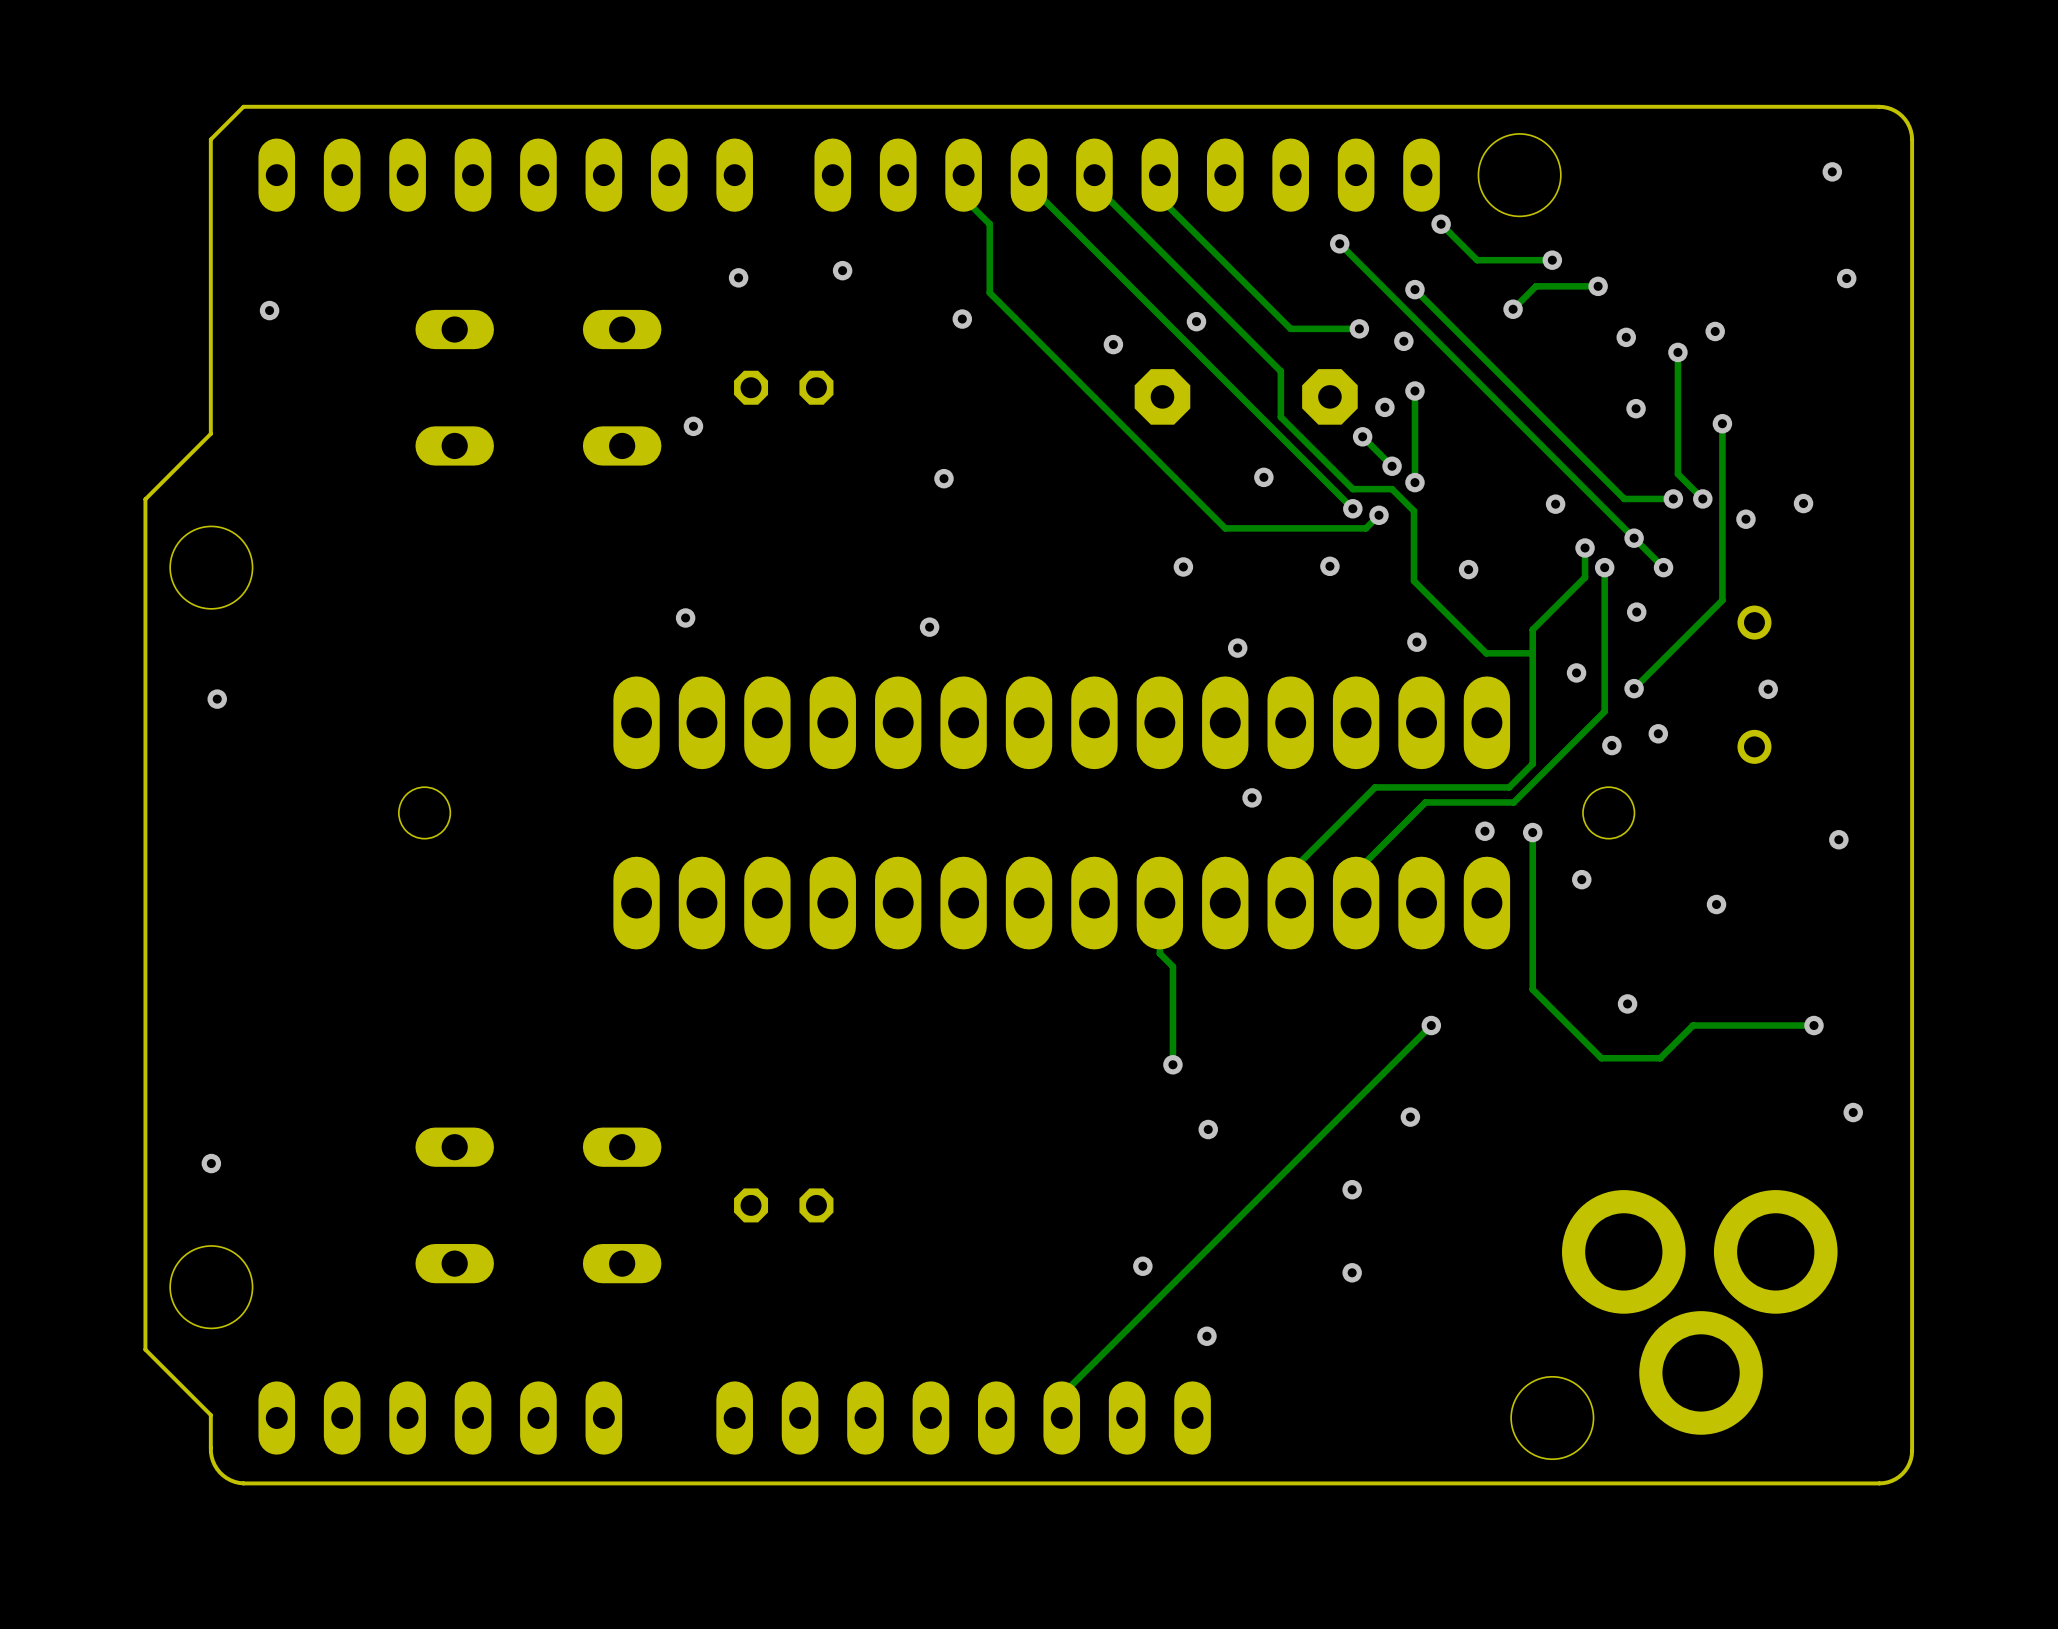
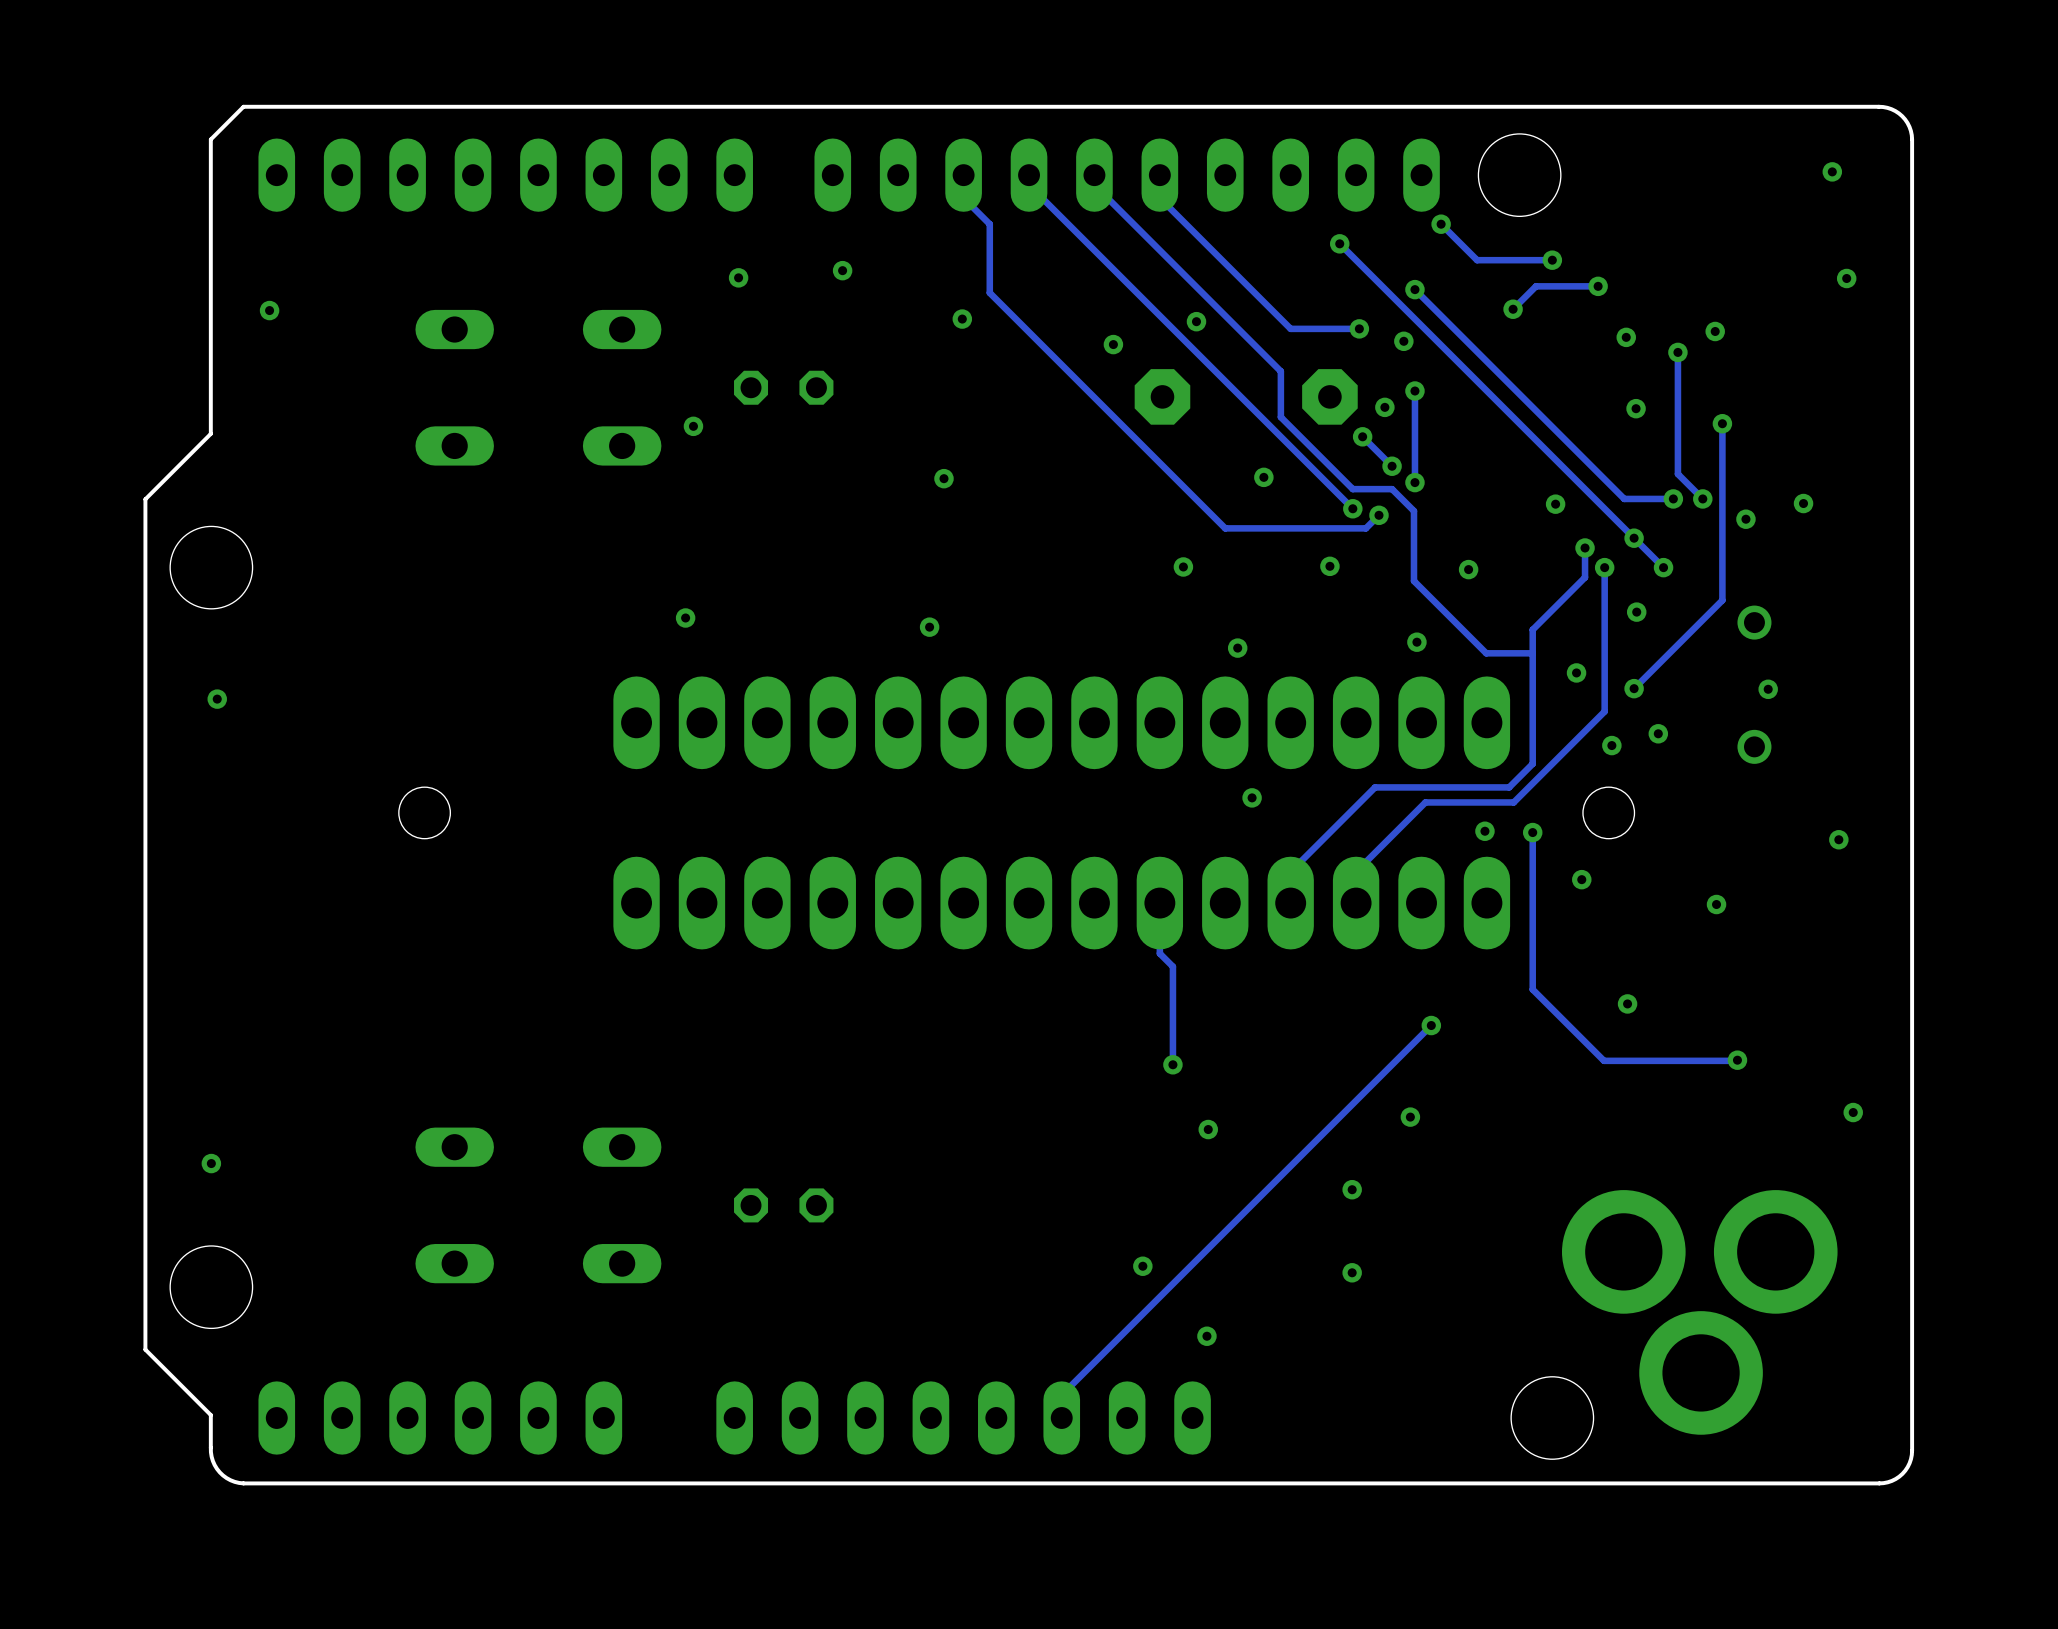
track: (1813, 1025) (1692, 1025) (1660, 1058) (1601, 1058) -> (1737, 1060) (1604, 1060) (1601, 1058)
via position: (1813, 1025) -> (1737, 1060)

